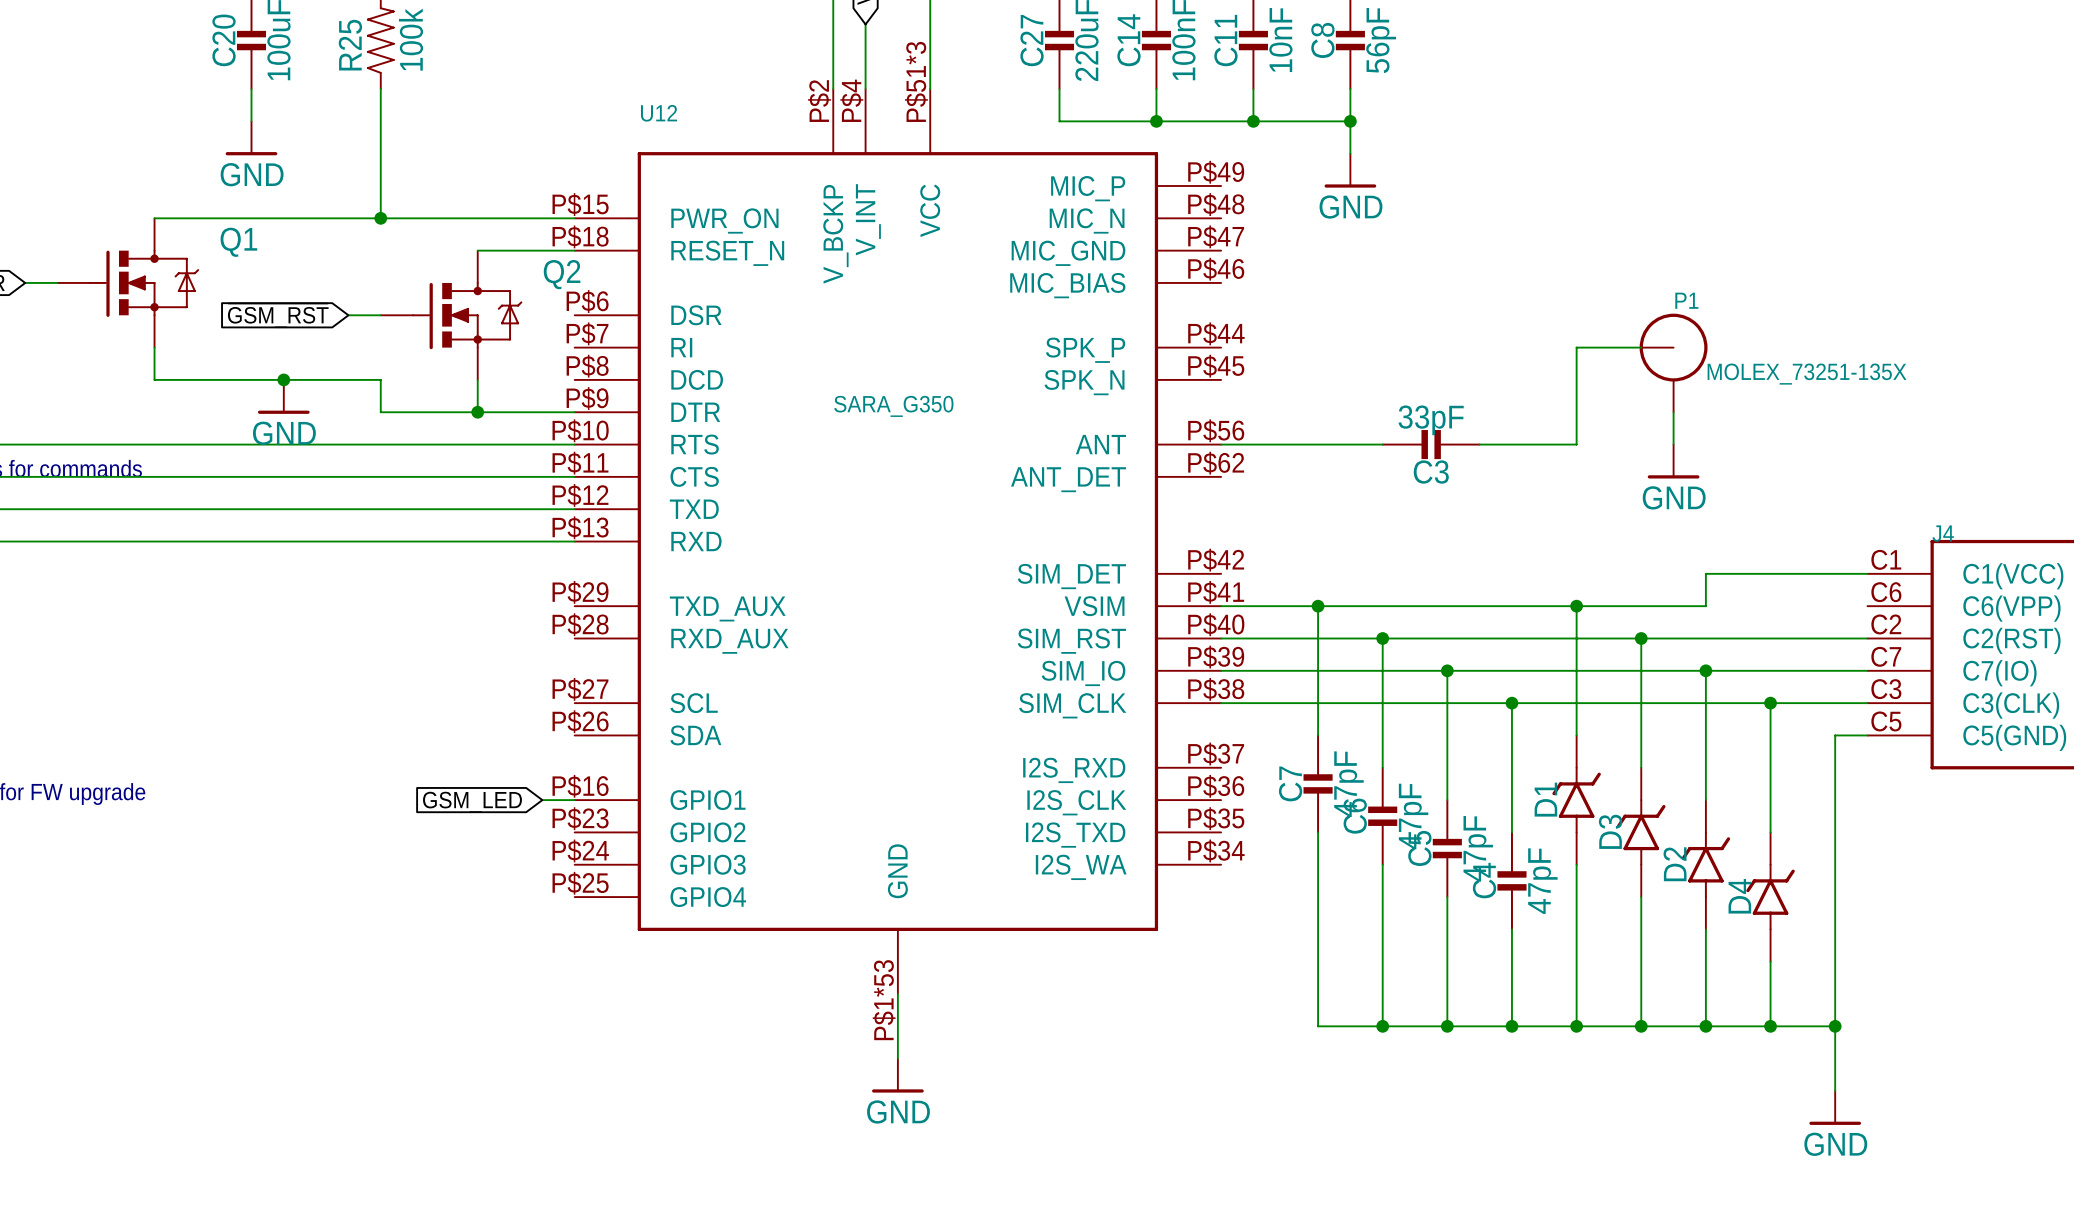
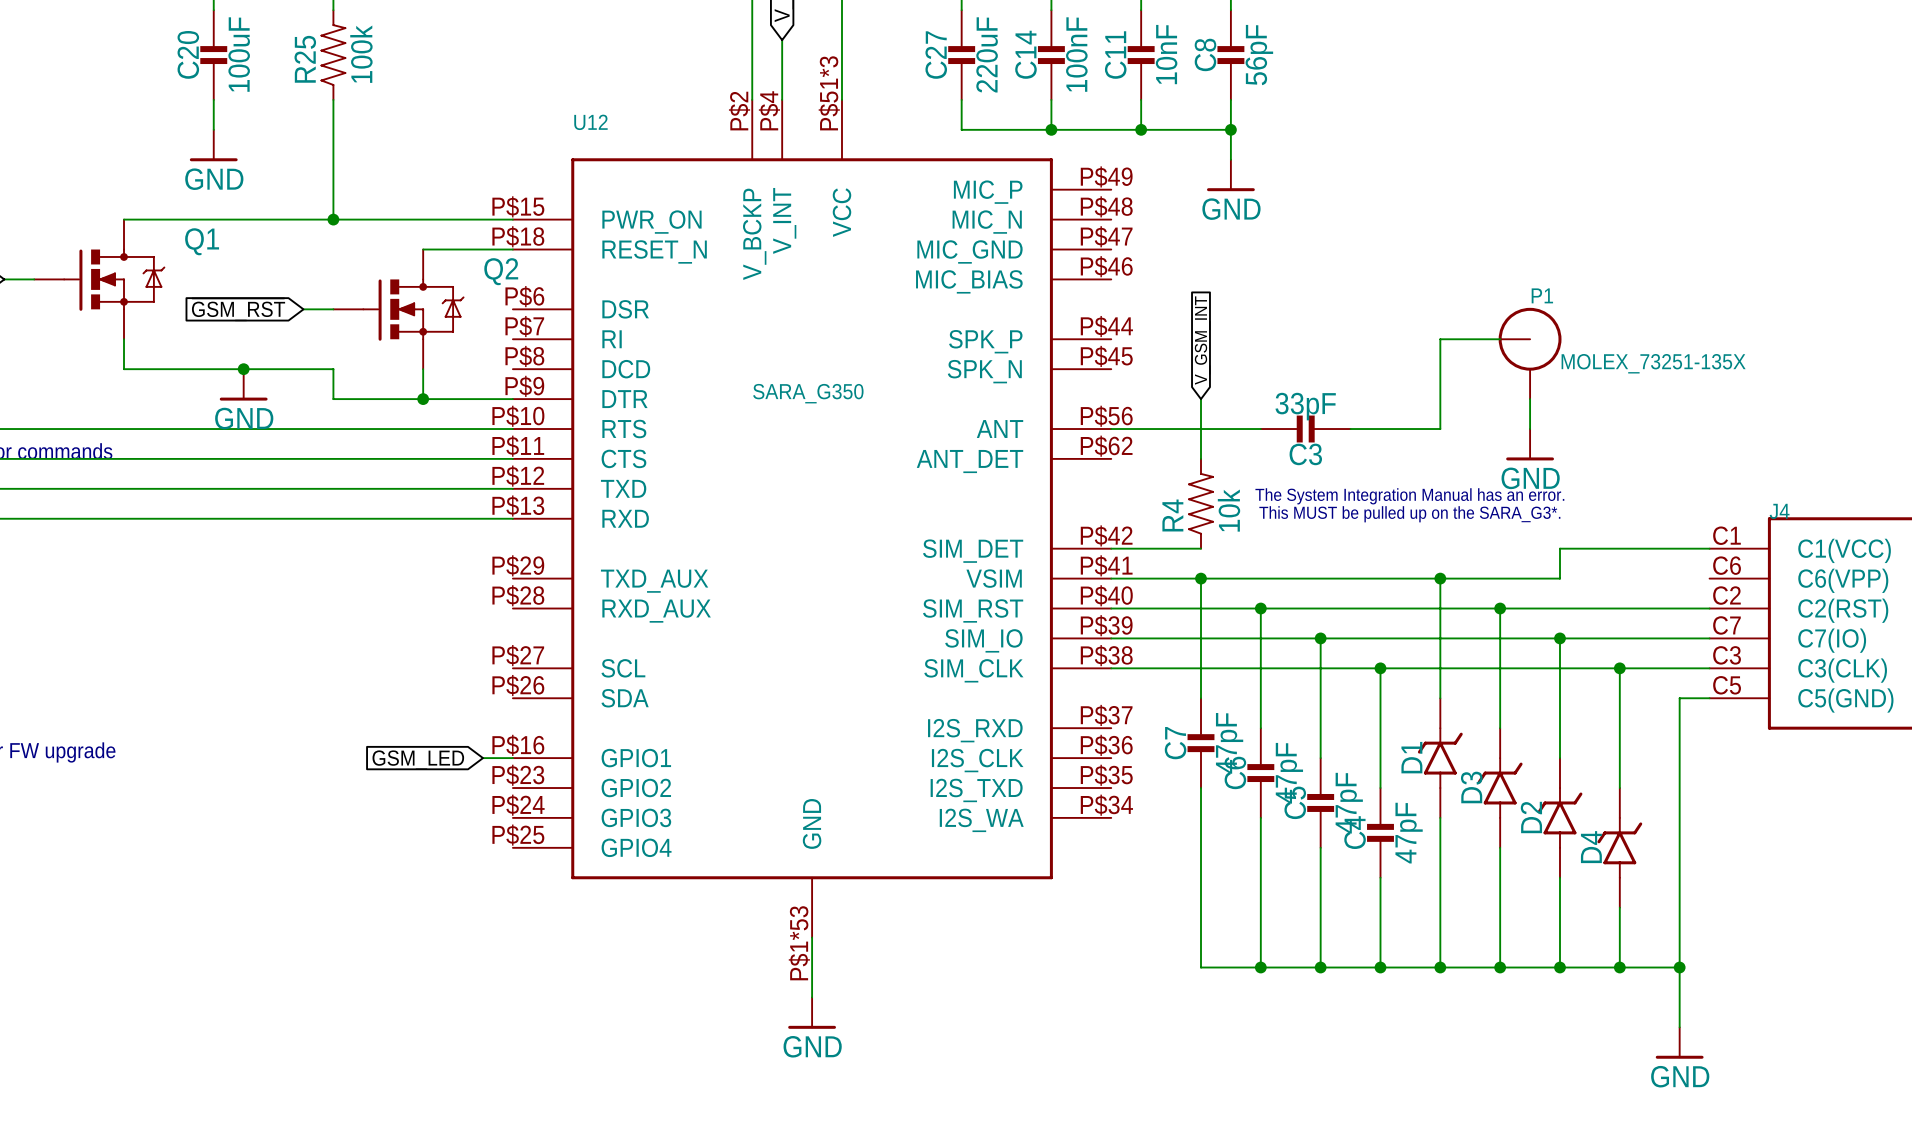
global label: none -> V_GSM_INT (1202, 340)
wire: none -> (1200, 399) (1200, 458)
text: none -> The System Integration Manual has an error. (1409, 496)
R4: none -> 10k (1200, 503)
text: none -> This MUST be pulled up on the SARA_G3*. (1409, 514)
wire: none -> (1111, 548) (1200, 548)

